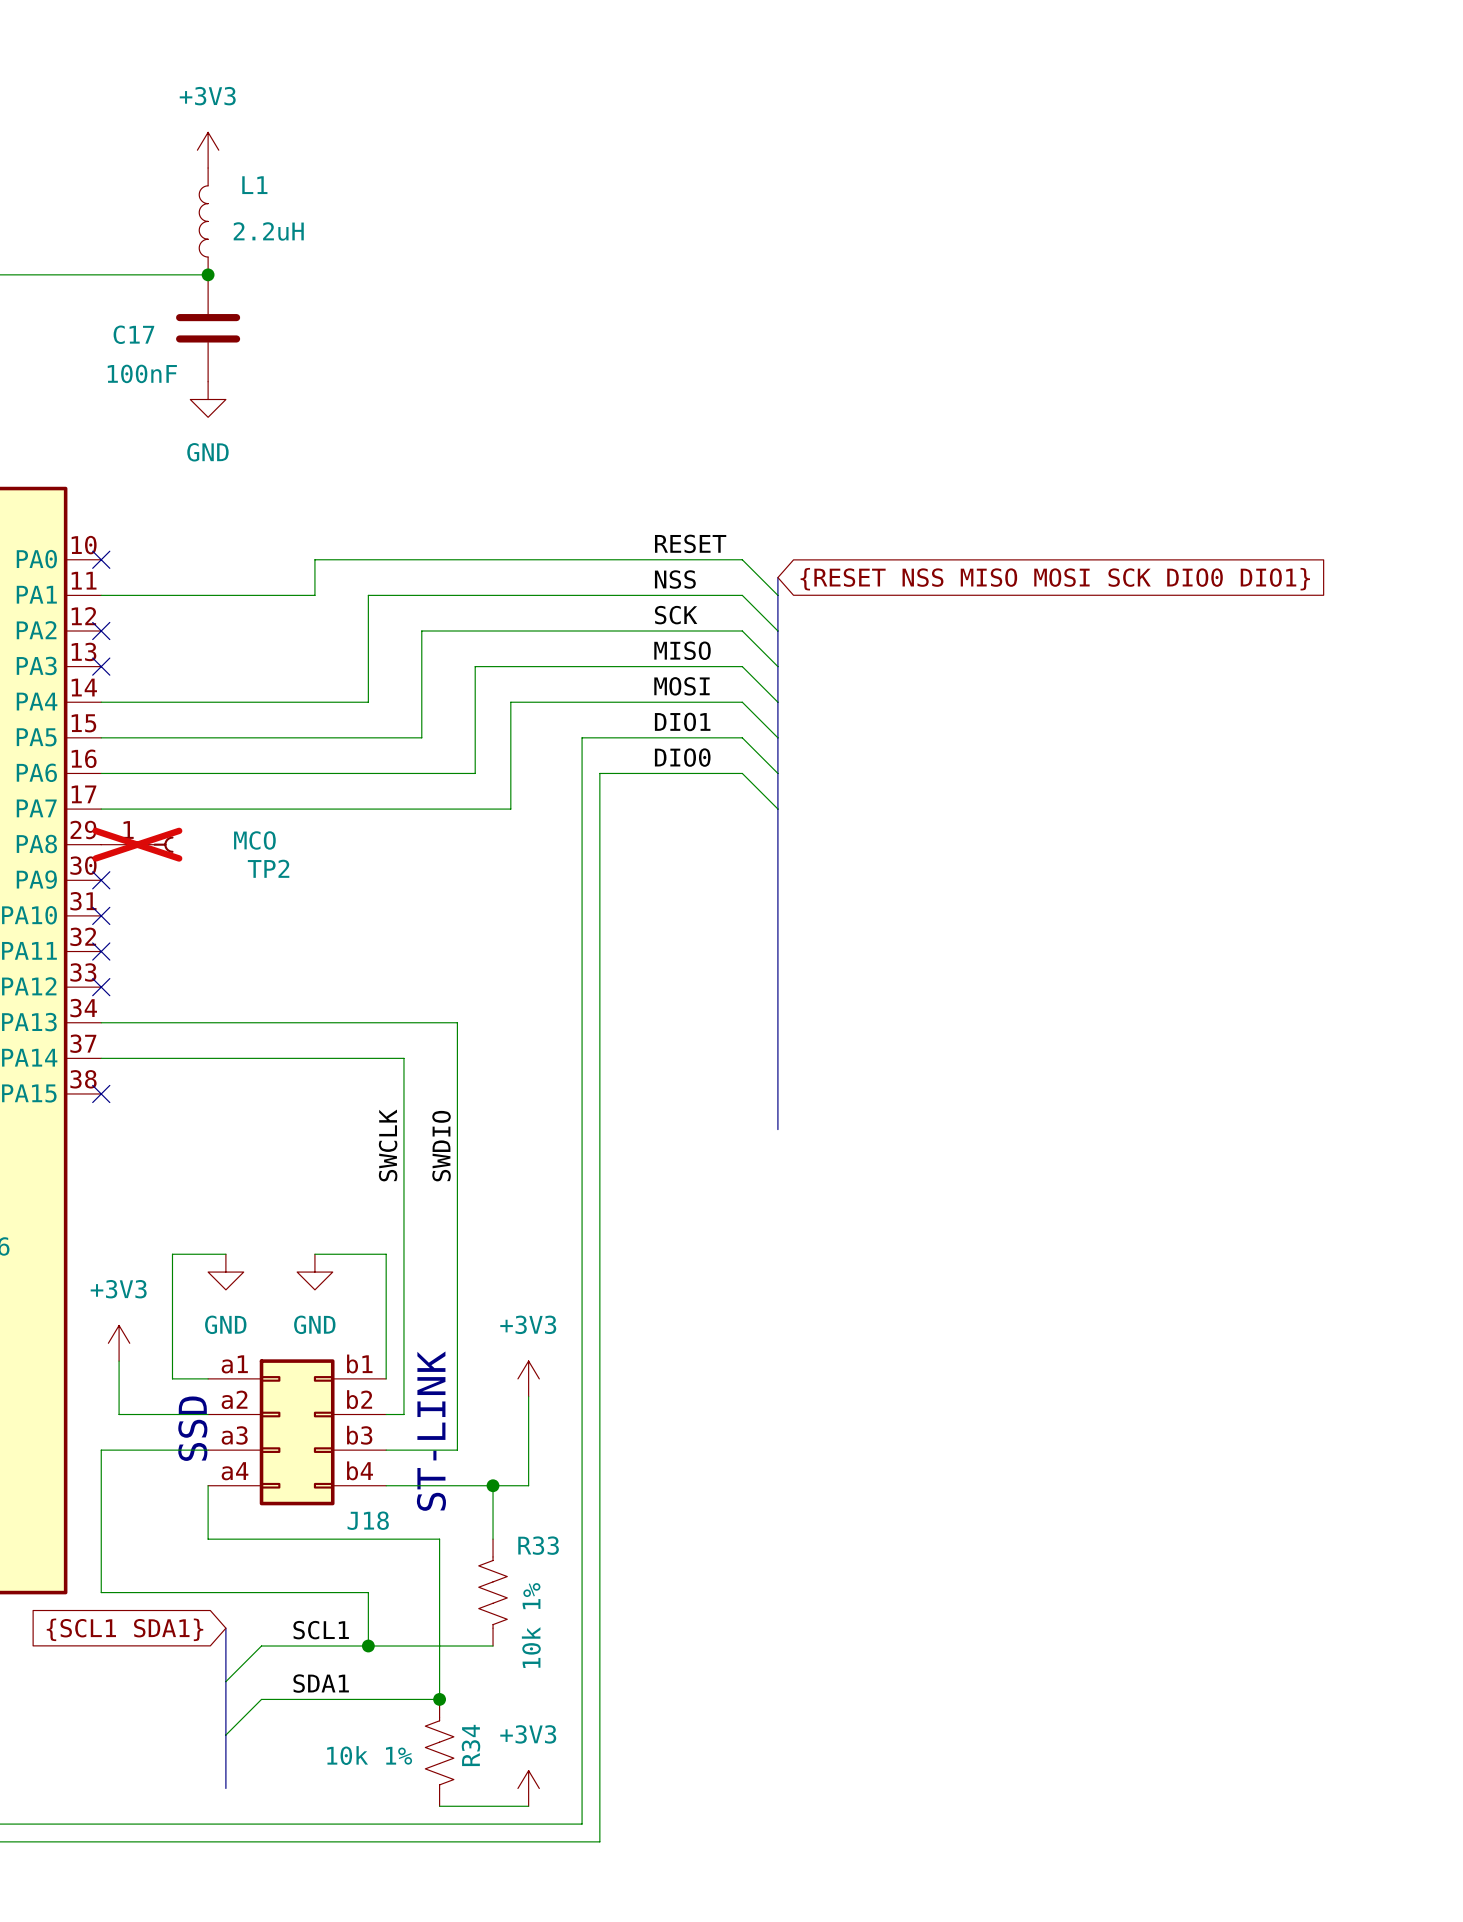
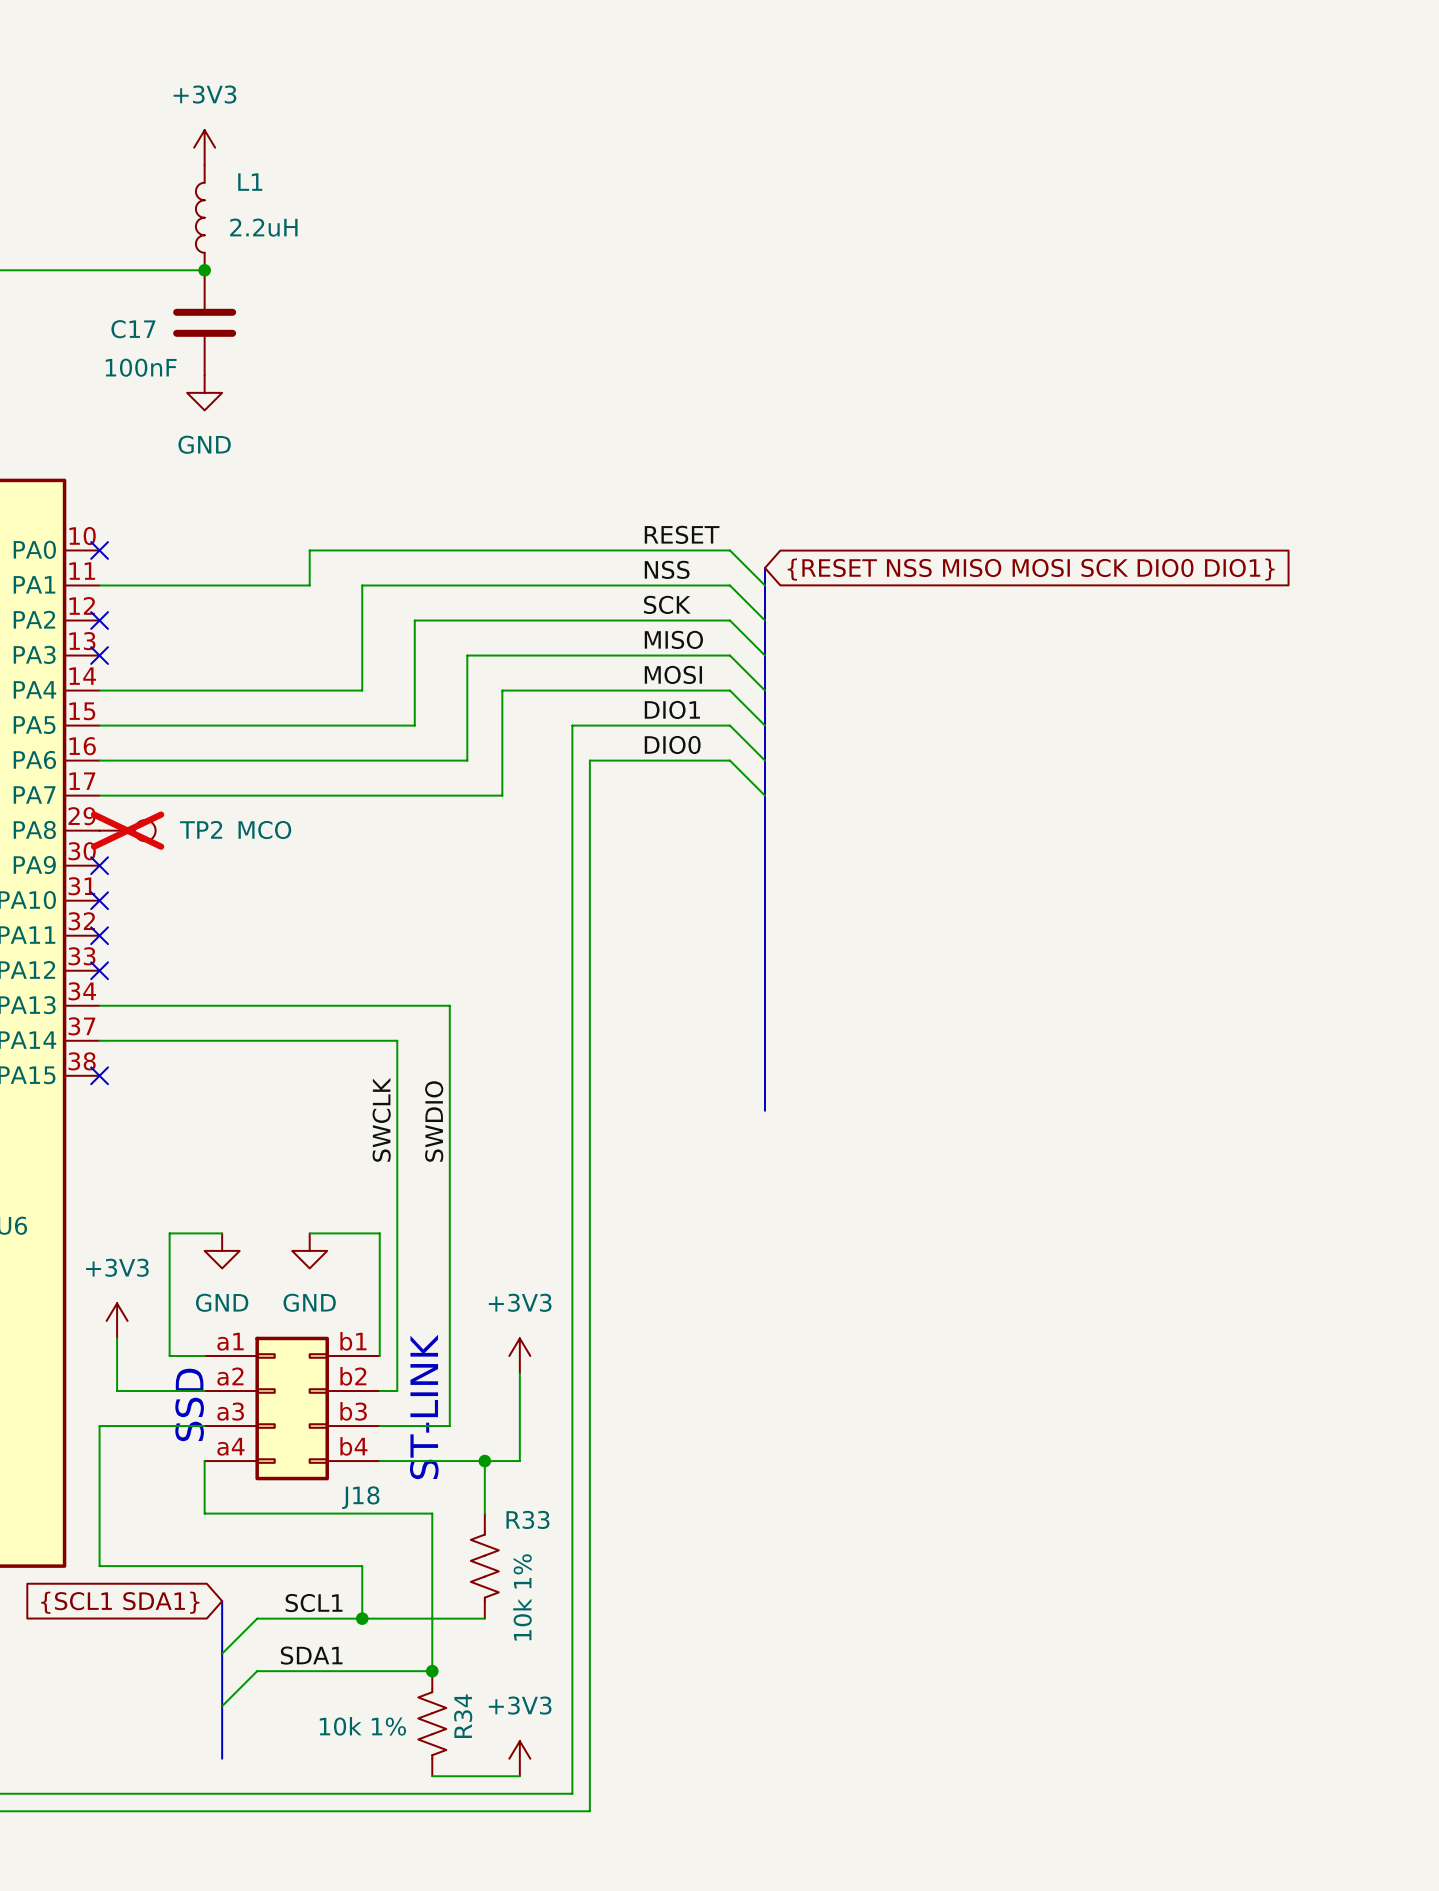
TP2 symbol: [101, 836, 174, 853] -> [99, 820, 156, 842]
TP2 name position: TP2 (268, 868) -> TP2 (201, 829)

